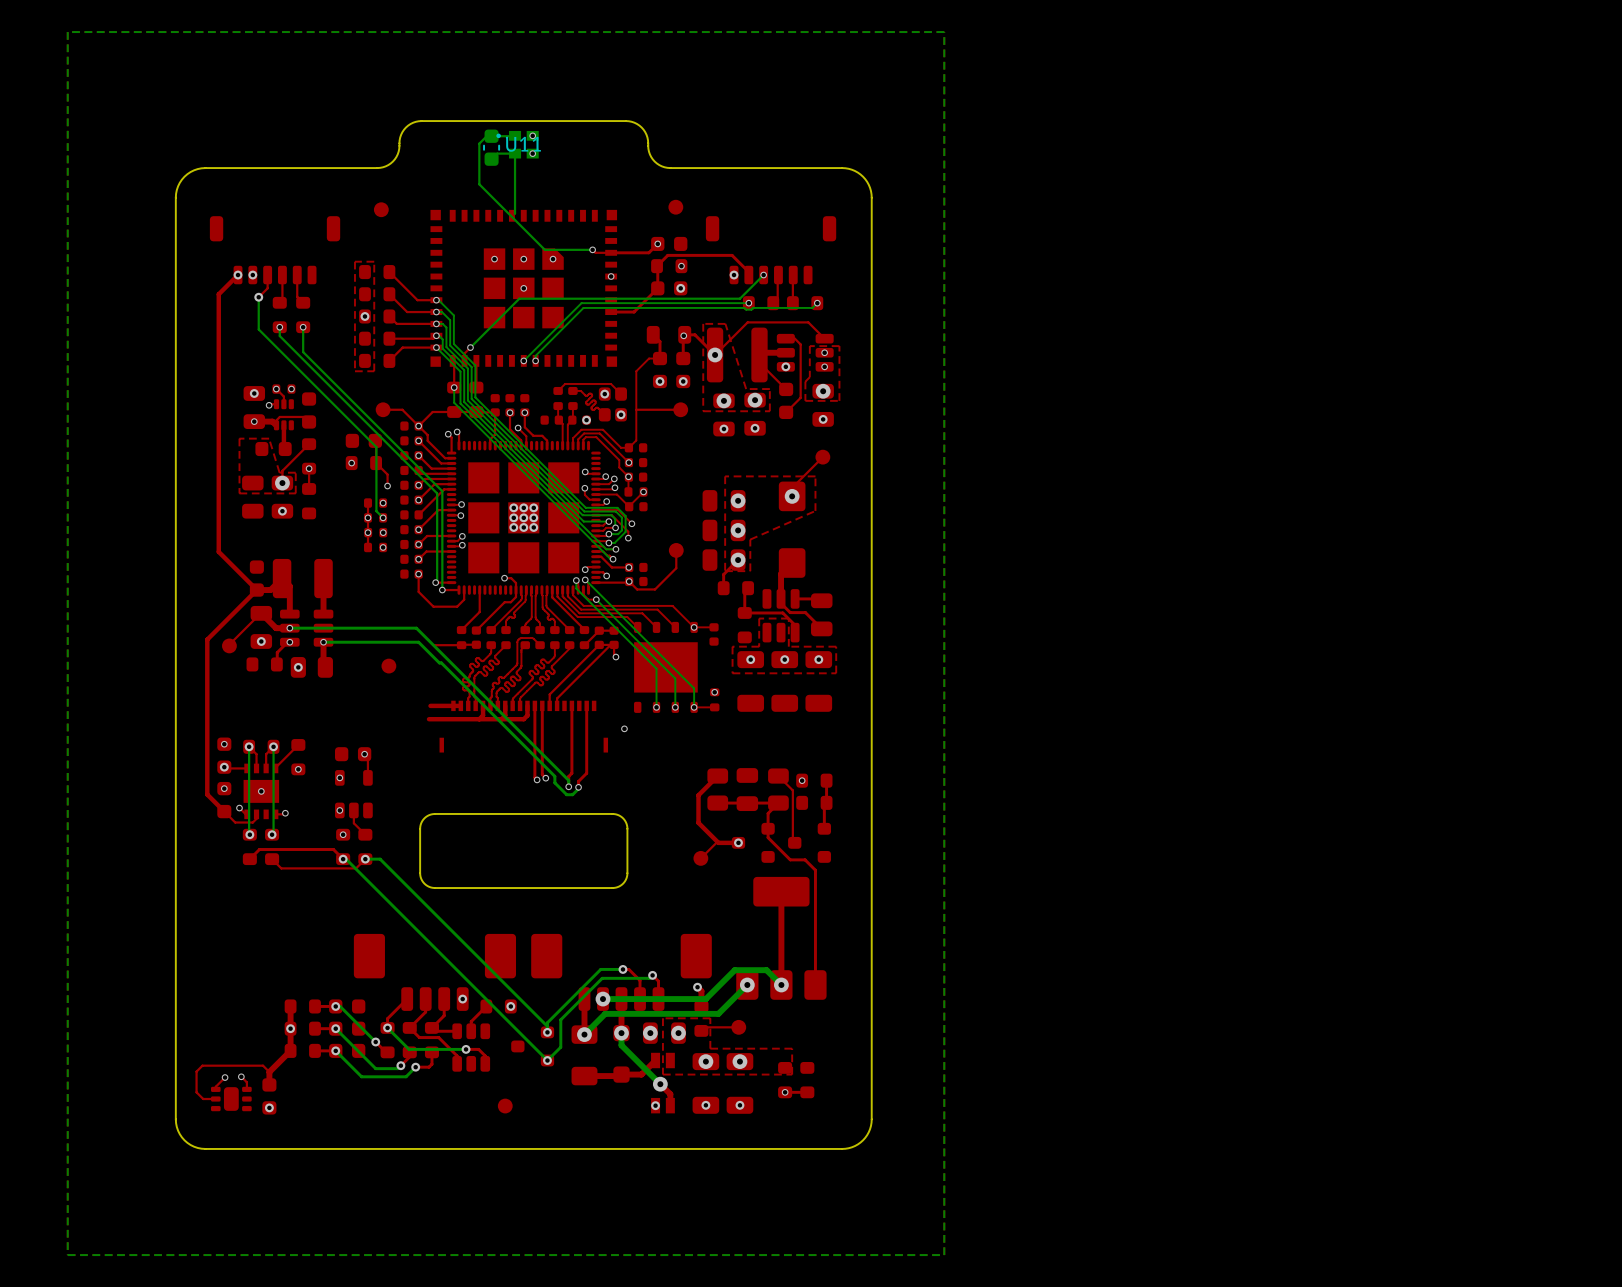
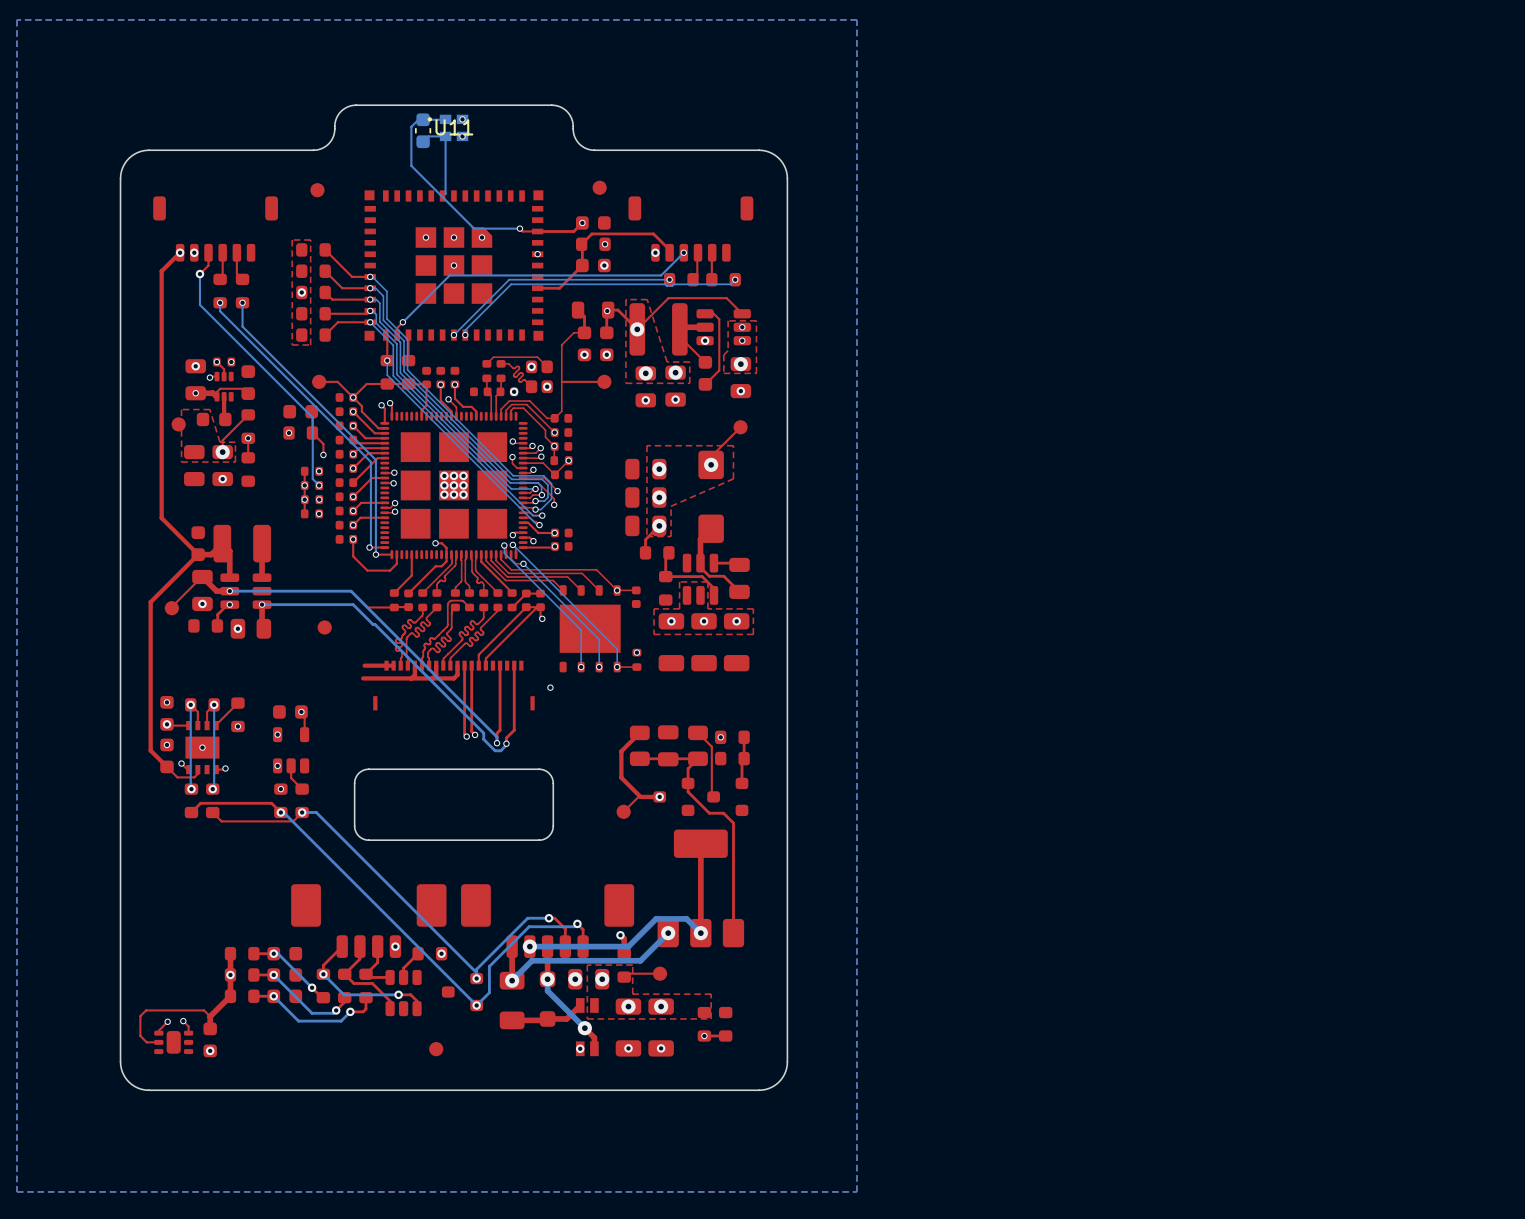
part: none -> (178, 424)
top track: (676, 550) (676, 568) (655, 589) (637, 589) (629, 581) -> none
part: (676, 550) -> none

